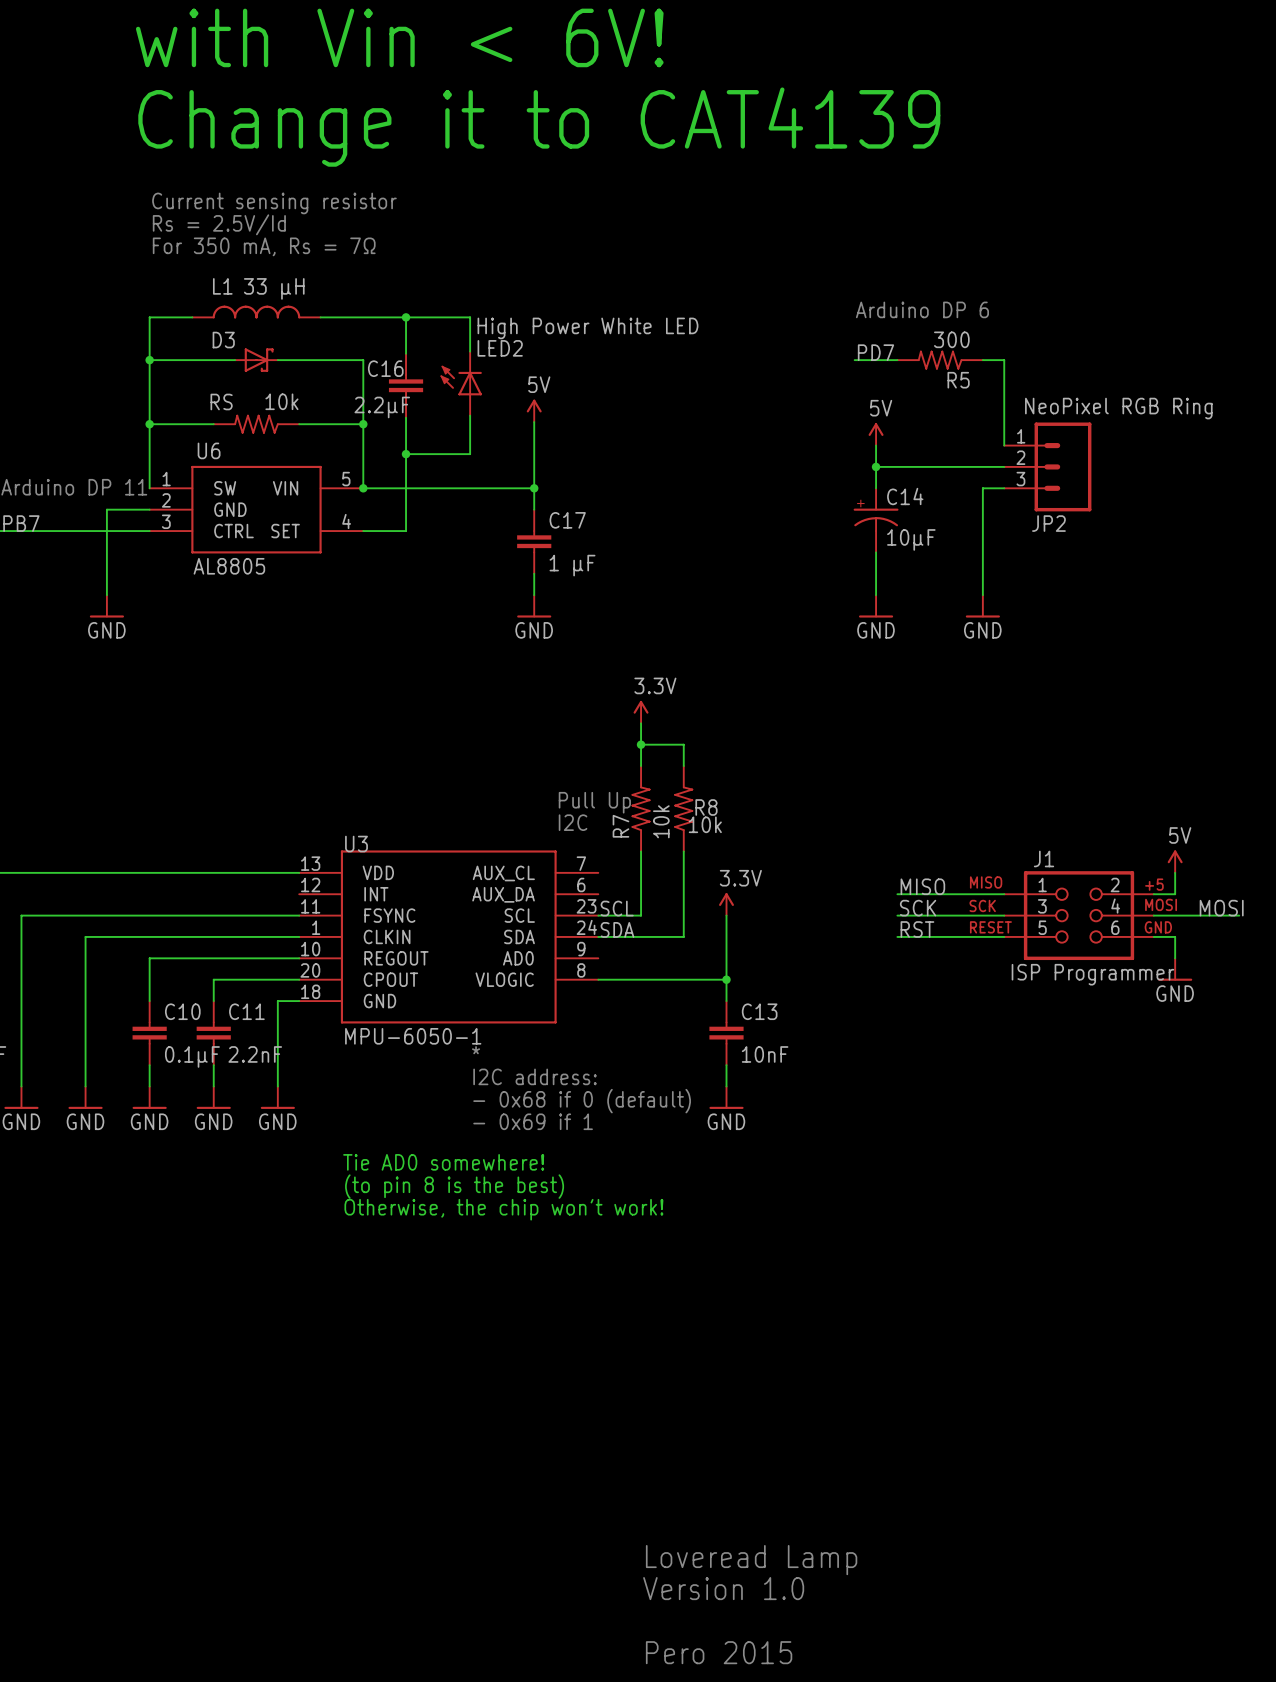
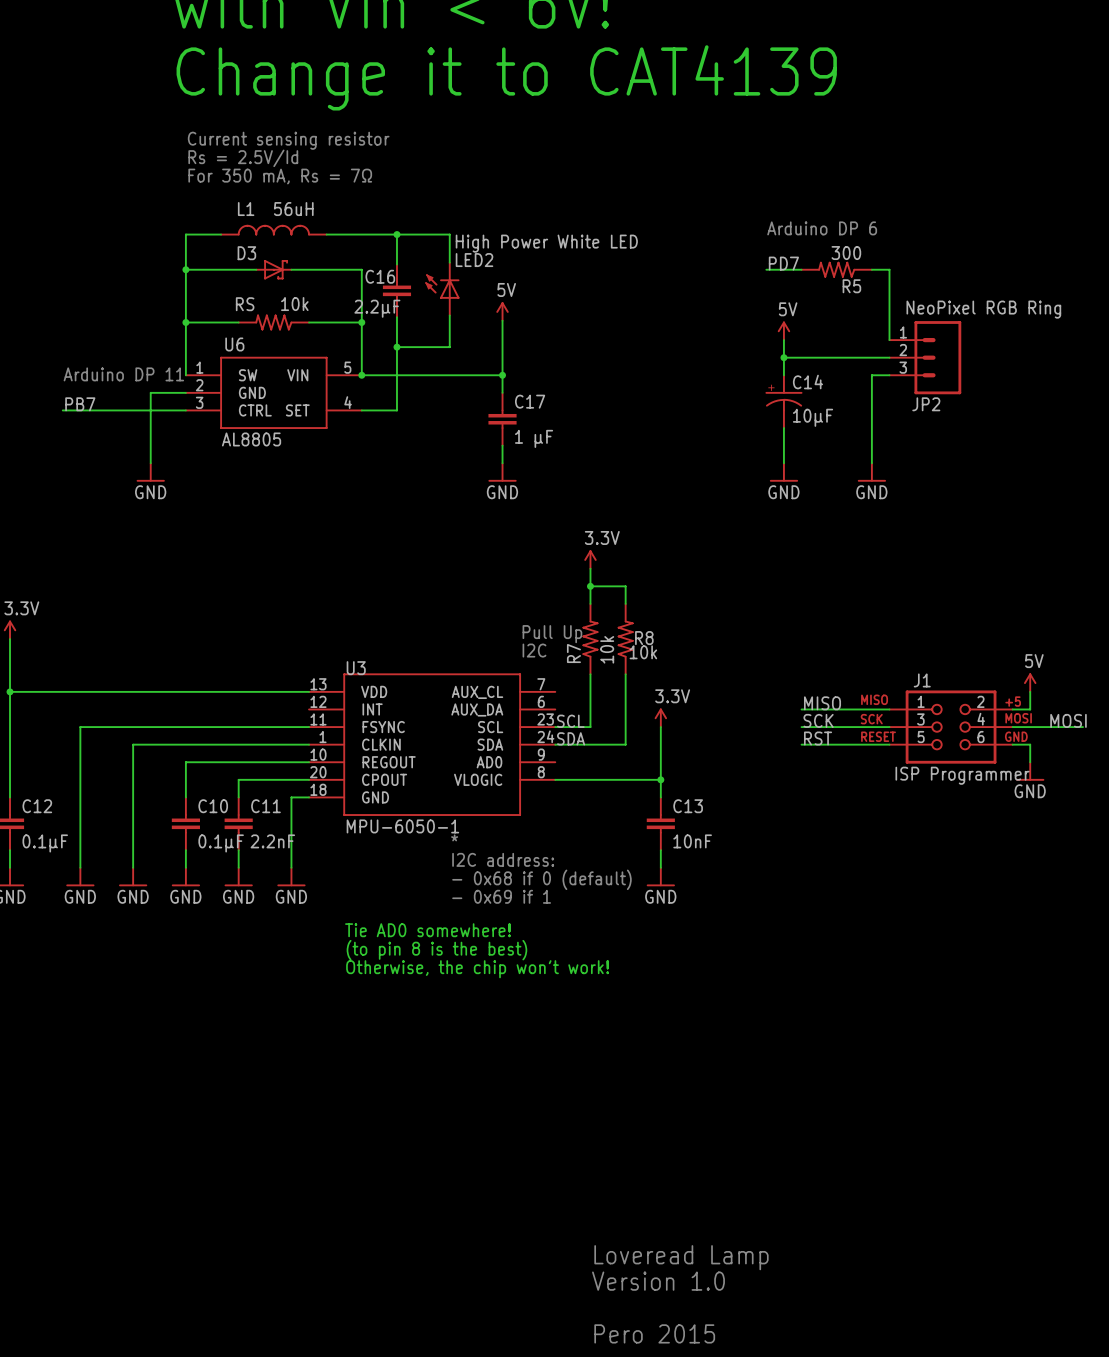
L1 value: 33 μH (274, 288) -> 56uH (293, 209)

